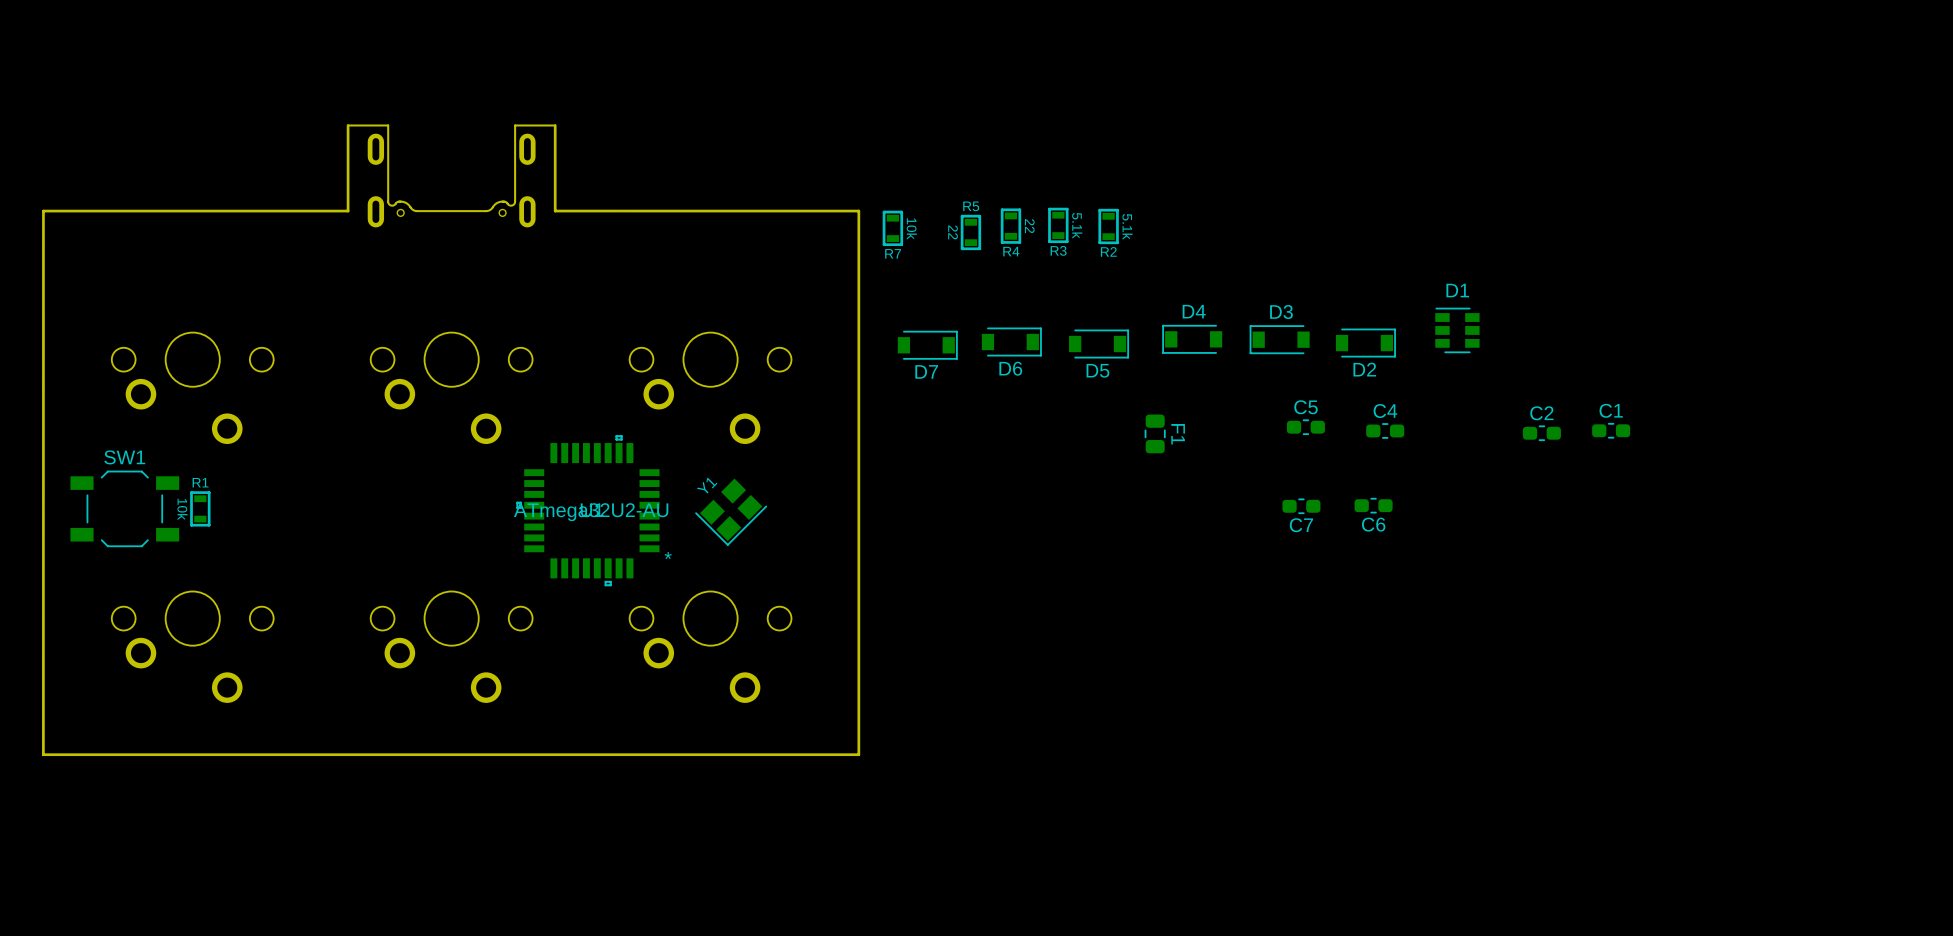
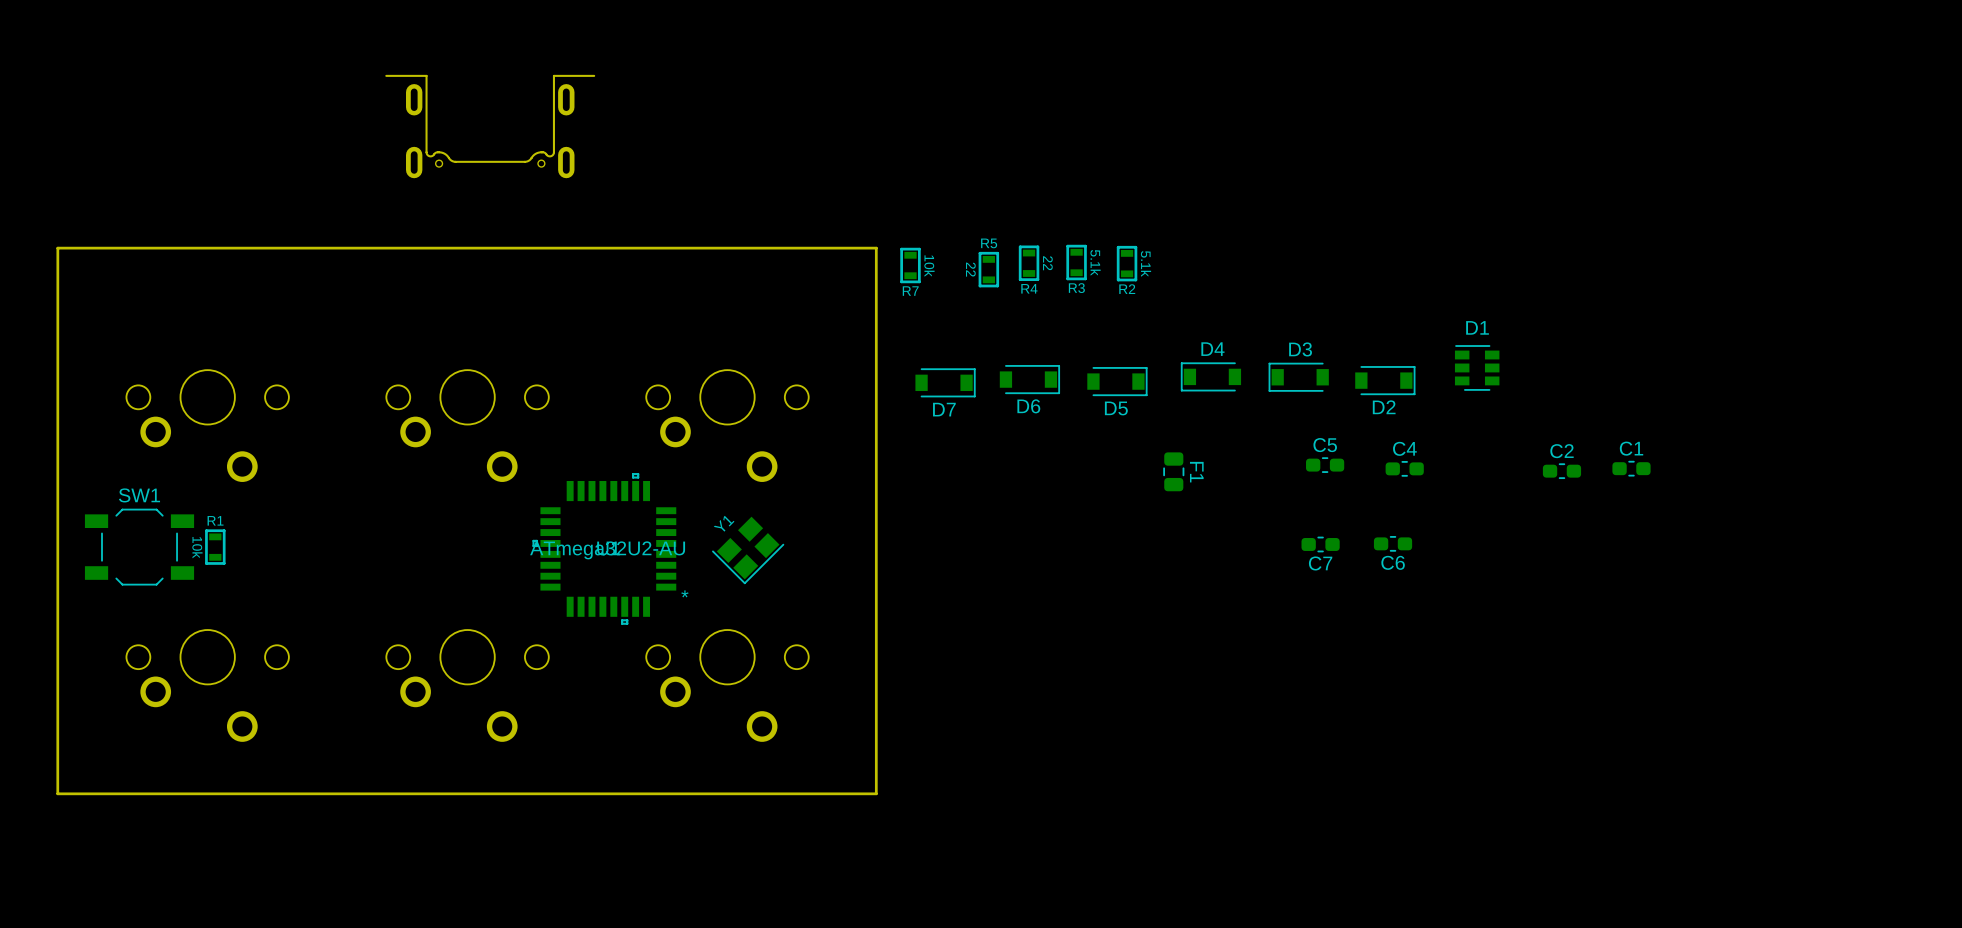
board edge: (348, 125) (348, 211) -> none
board edge: (555, 125) (555, 211) (858, 211) -> (363, 248) (876, 248)
part position: (451, 175) -> (490, 126)

